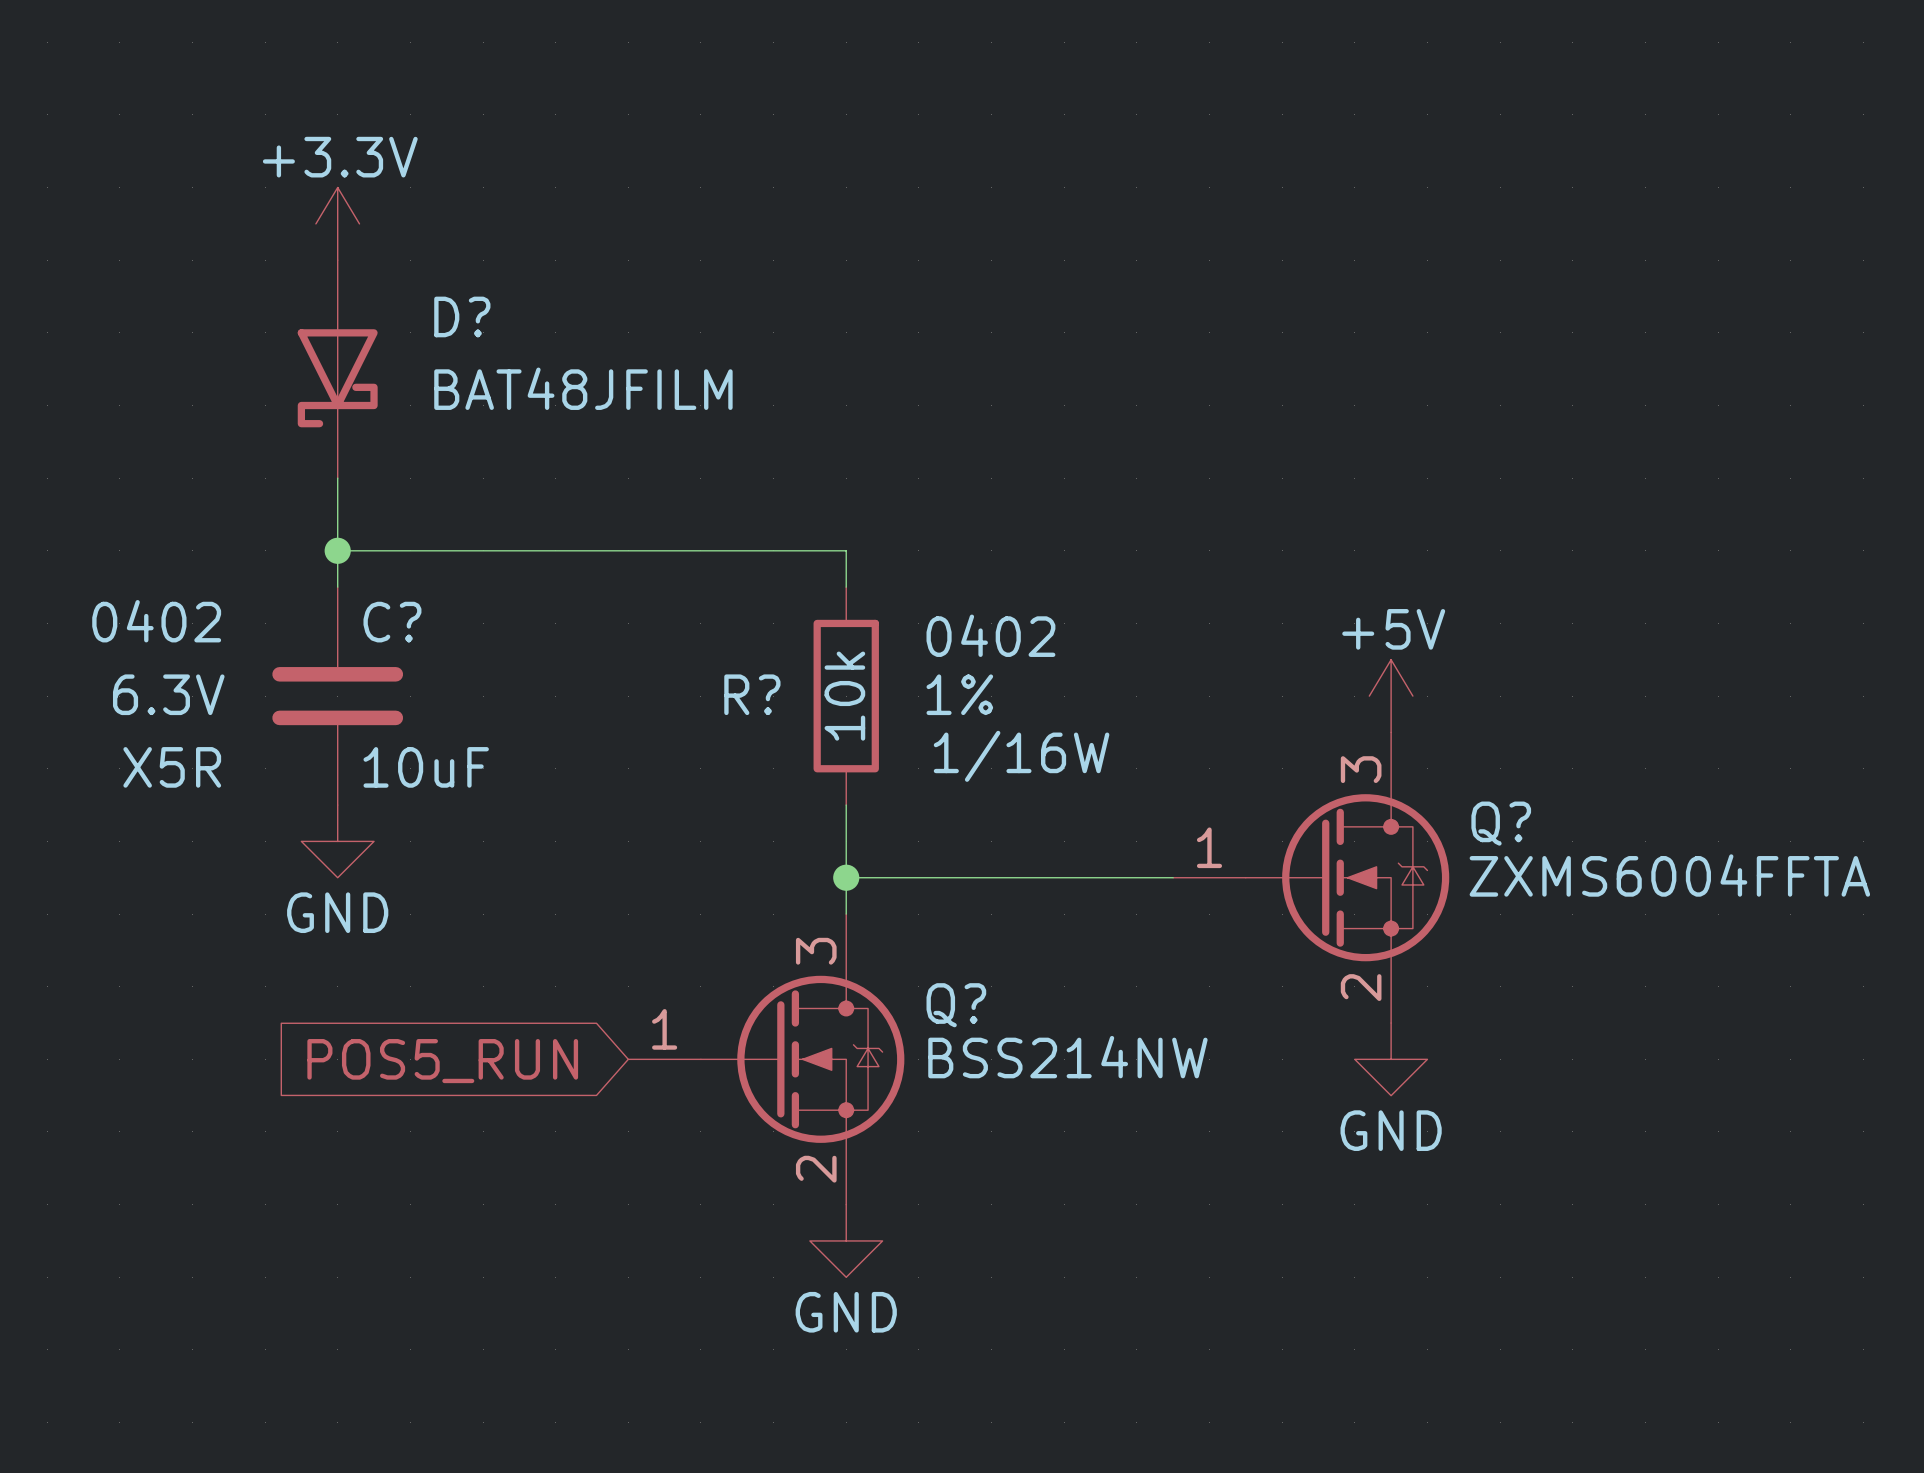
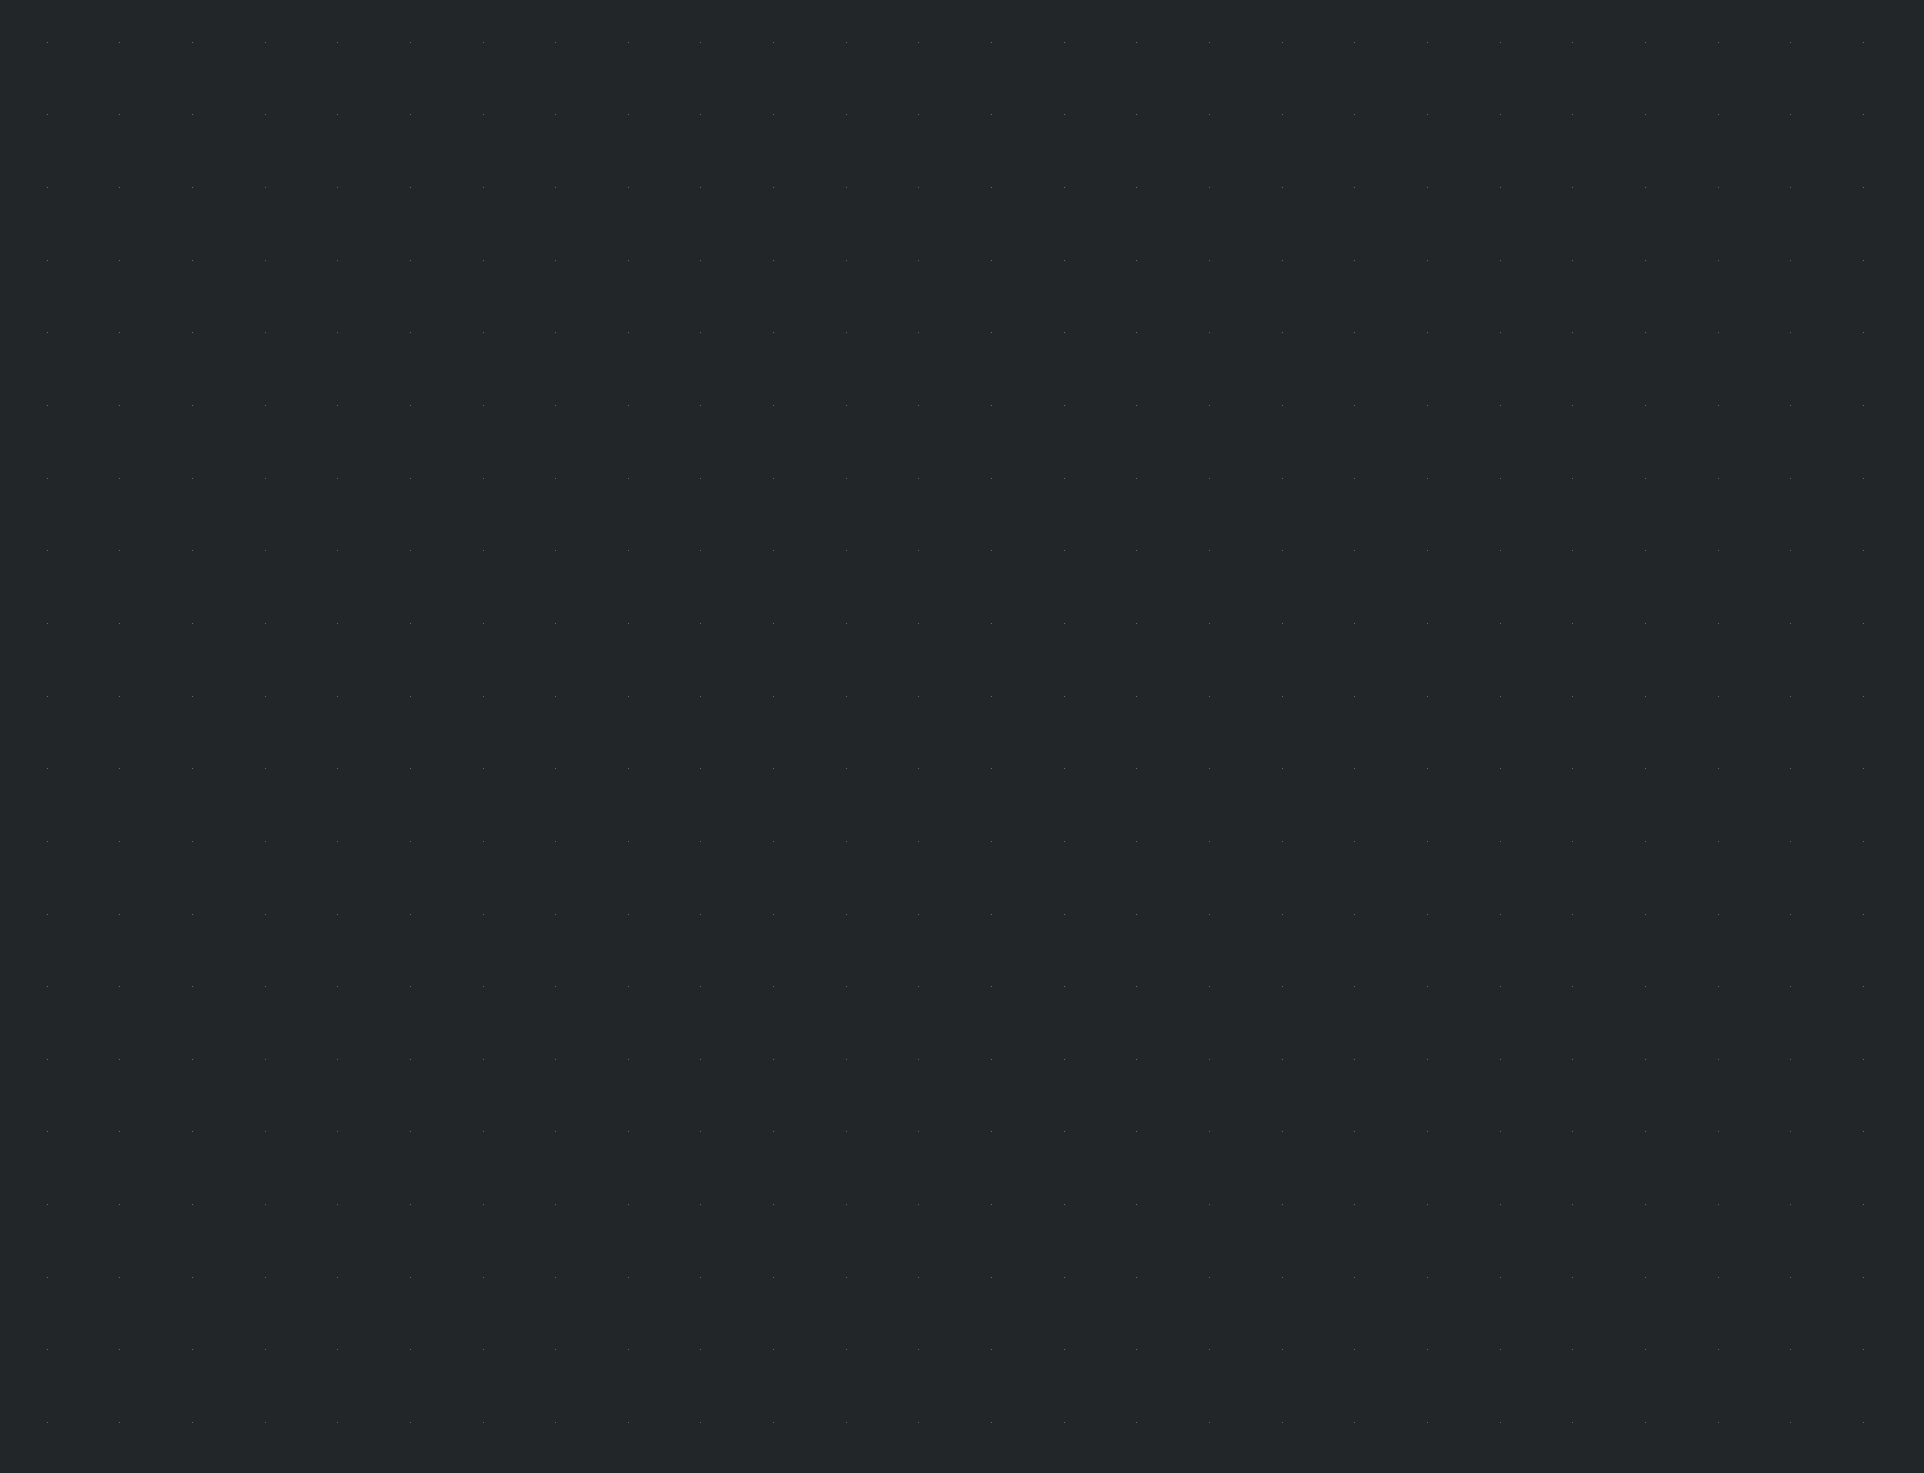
power symbol: +3.3V (337, 223) -> none
D?: BAT48JFILM (337, 369) -> none
wire: (337, 478) (337, 587) -> none
wire: (337, 550) (846, 550) (846, 587) -> none
junction: (337, 550) -> none
C?: 10uF (337, 696) -> none
R?: 10k (846, 696) -> none
power symbol: +5V (1391, 696) -> none
wire: (846, 805) (846, 914) -> none
power symbol: GND (337, 841) -> none
wire: (846, 877) (1173, 877) -> none
junction: (846, 877) -> none
Q?: ZXMS6004FFTA (1311, 877) -> none
Q?: BSS214NW (766, 1059) -> none
power symbol: GND (1391, 1059) -> none
global label: POS5_RUN (442, 1061) -> none
power symbol: GND (846, 1240) -> none

